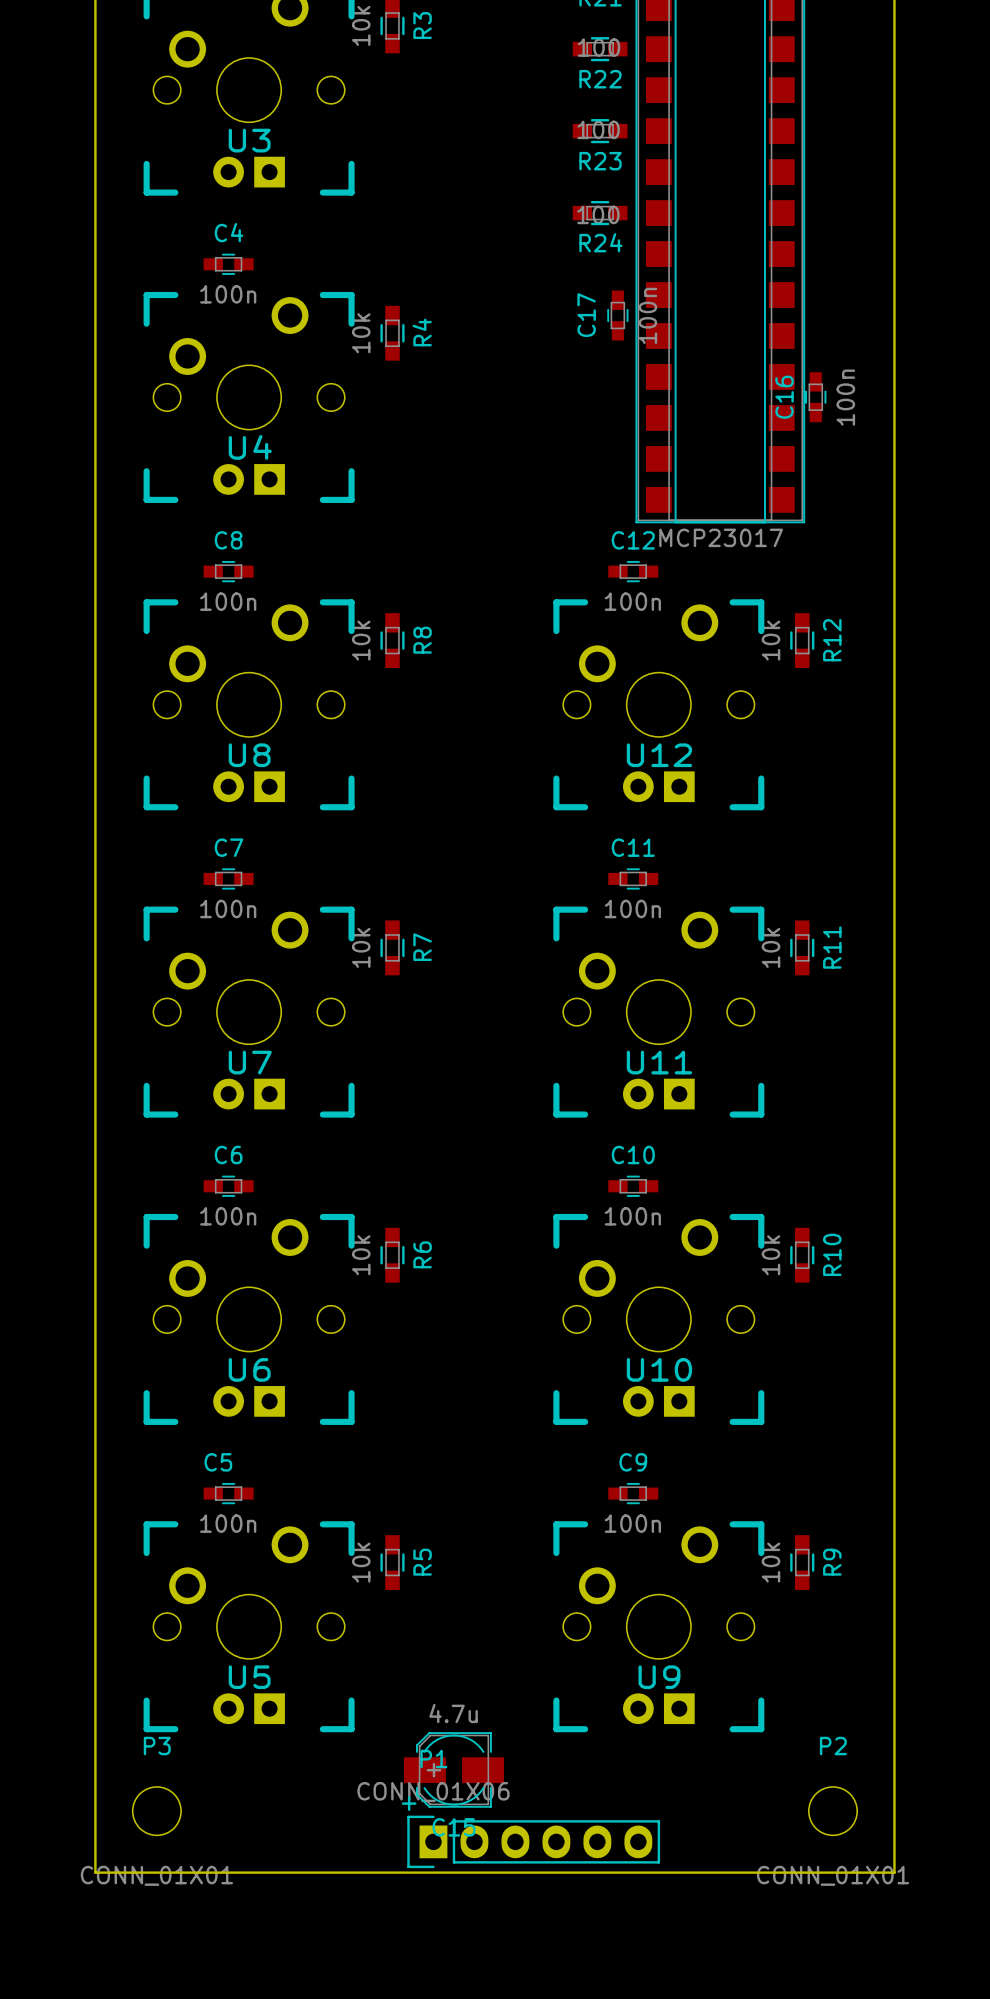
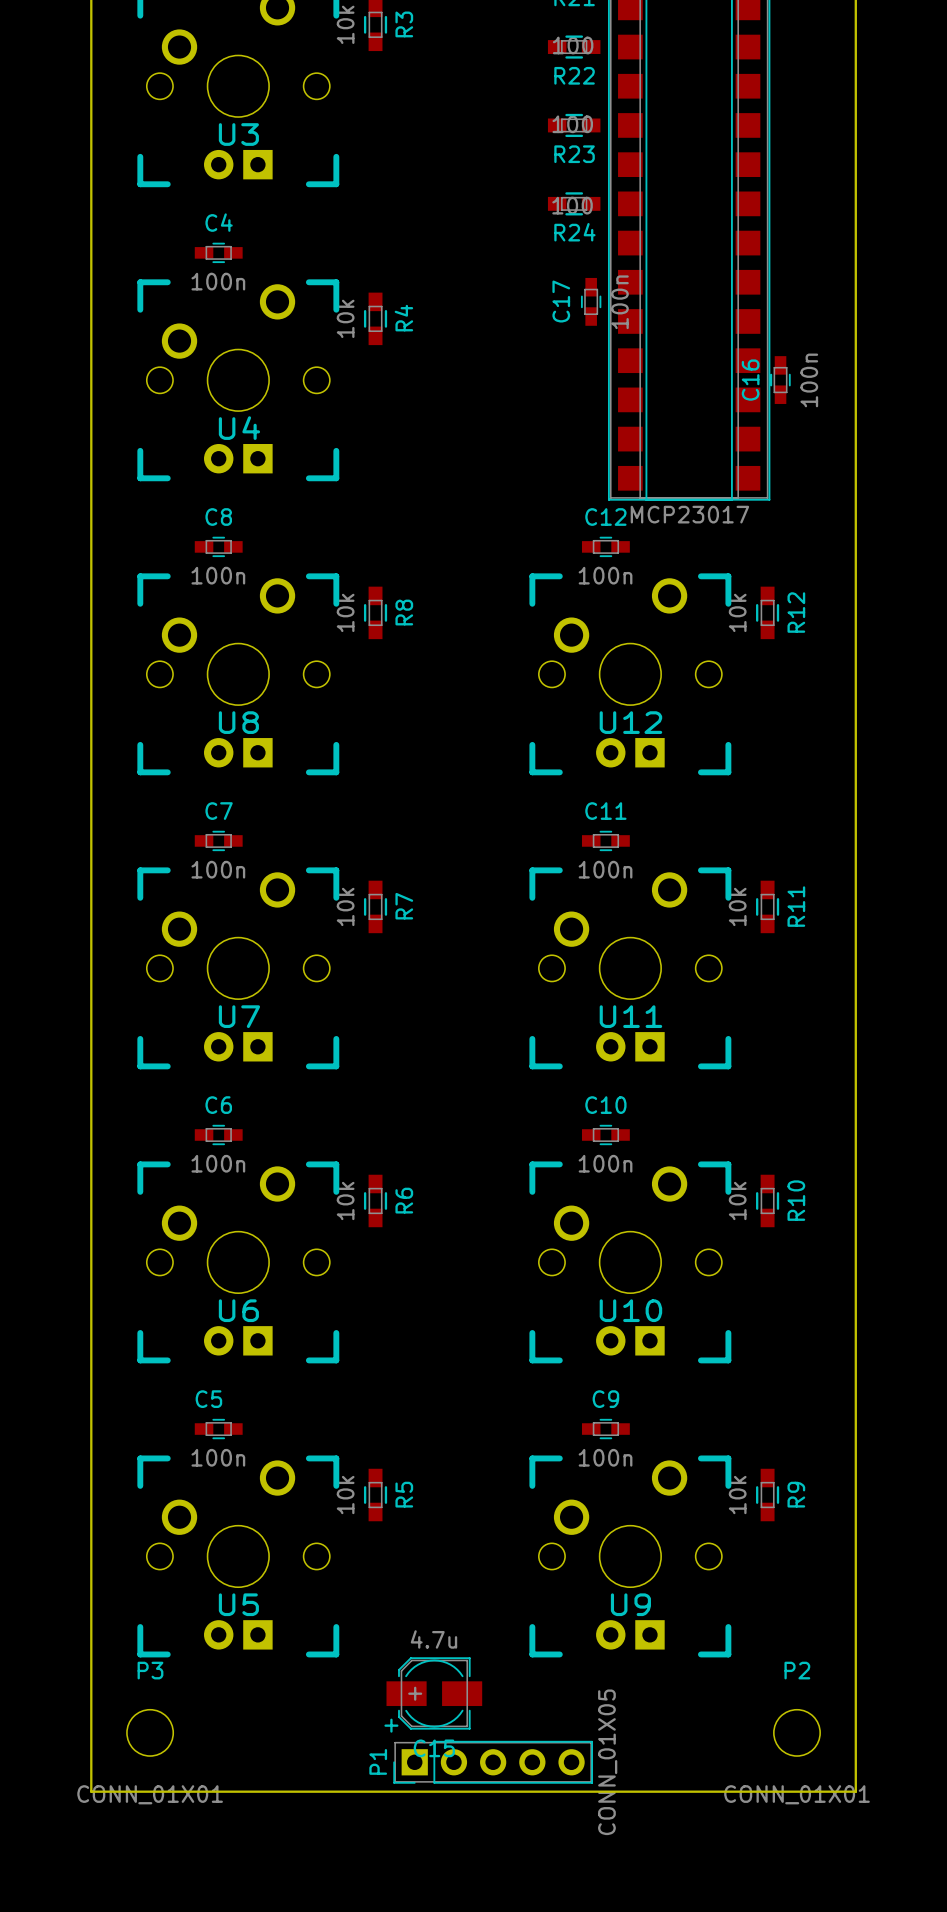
P1 name position: P1 (433, 1759) -> P1 (378, 1761)
P1 value: CONN_01X06 (433, 1792) -> CONN_01X05 (607, 1762)
P1 footprint: [407, 1815, 661, 1869] -> [393, 1740, 594, 1784]

